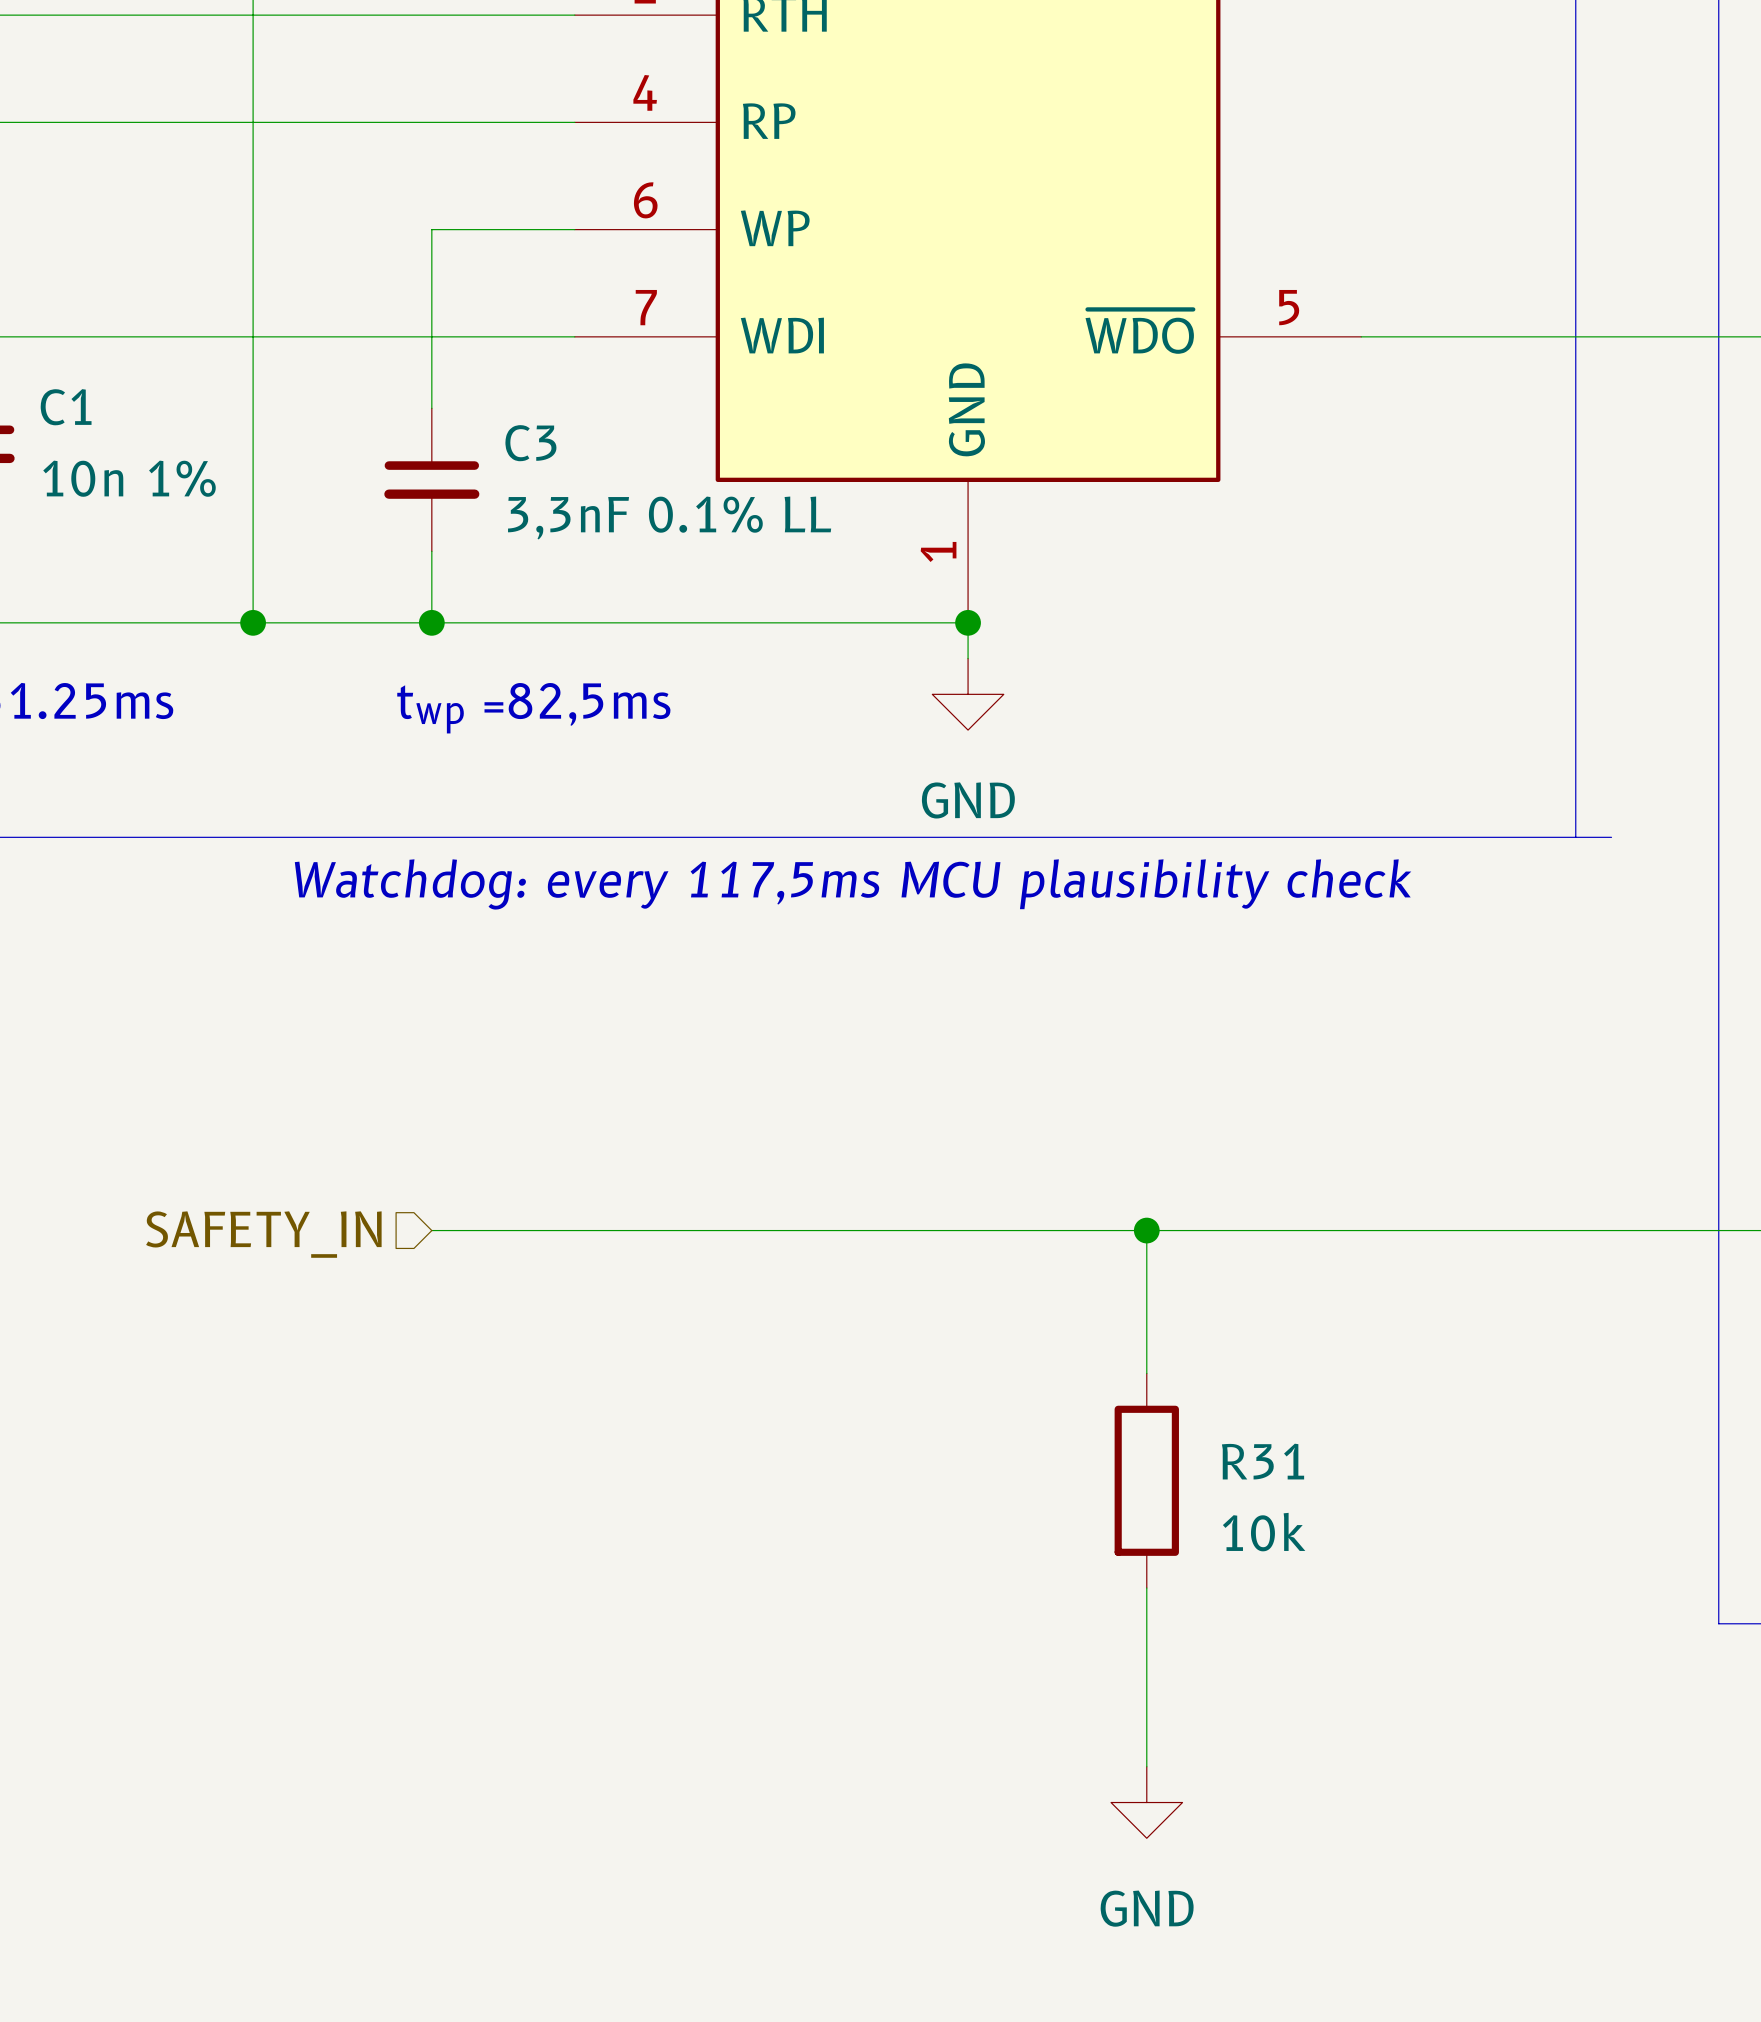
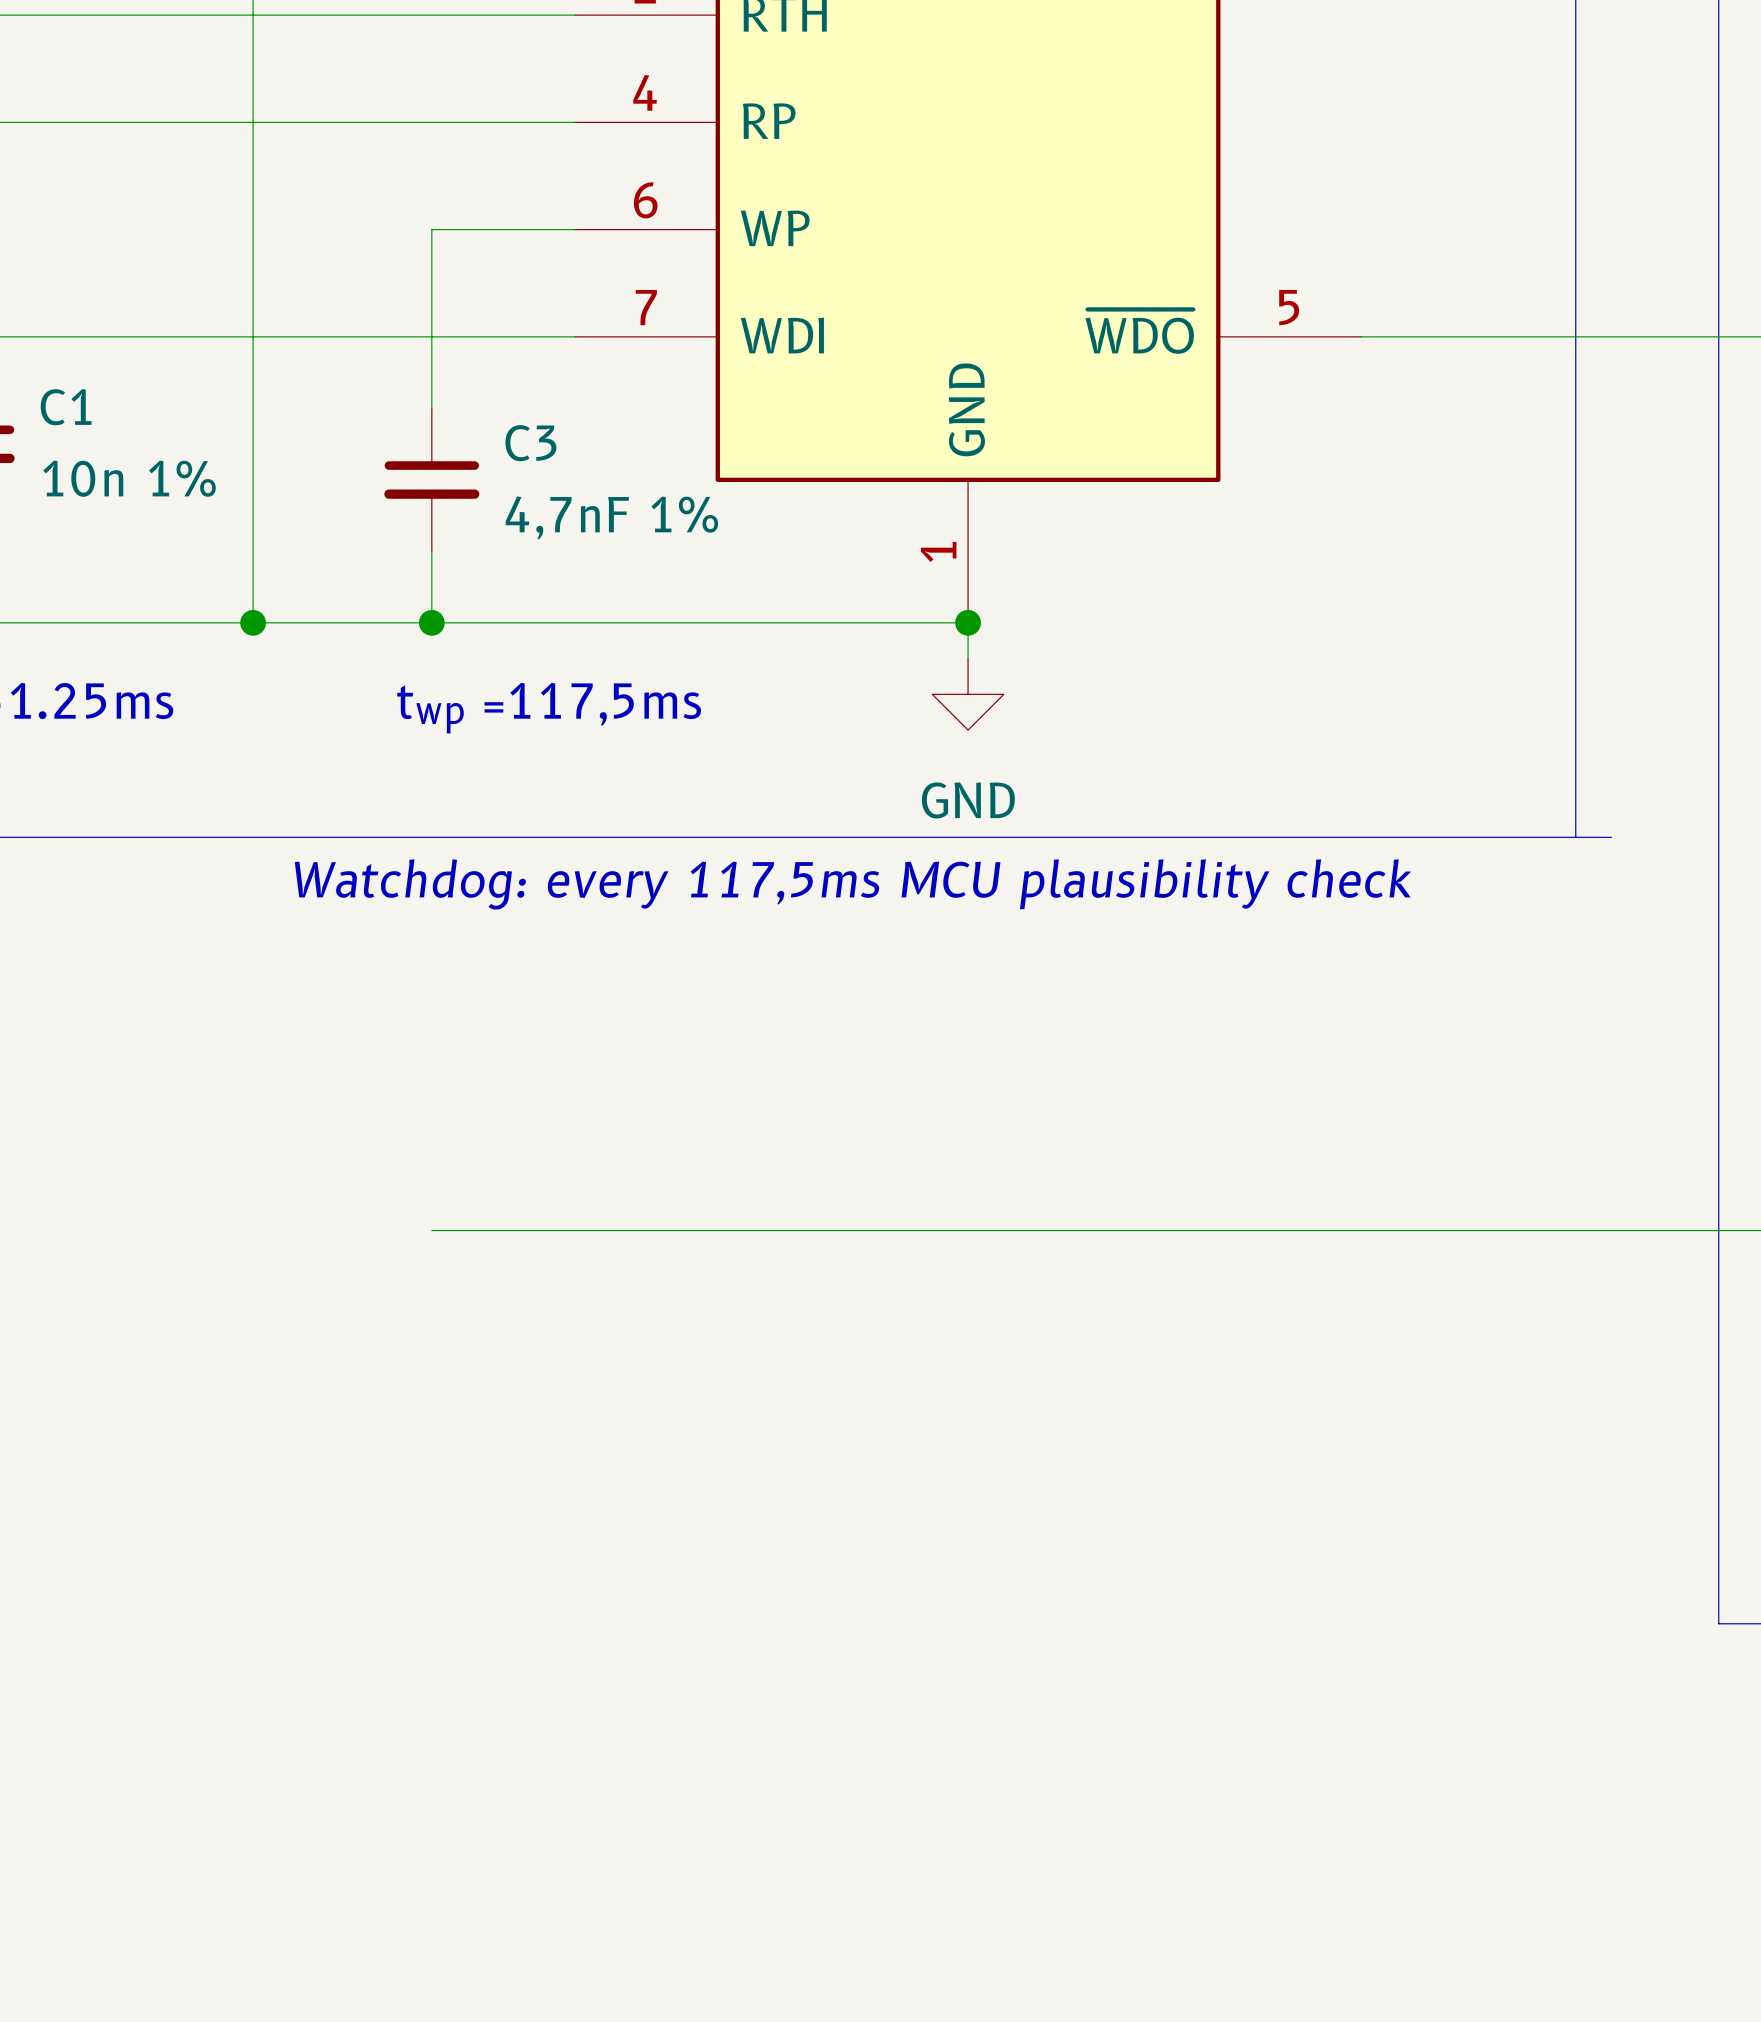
C3 value: 3,3nF 0.1% LL (669, 517) -> 4,7nF 1% (611, 517)
text: twp =82,5ms (533, 708) -> twp =117,5ms (549, 708)
wire: (1146, 1230) (1146, 1373) -> none
junction: (1146, 1230) -> none
hierarchical label: SAFETY_IN (263, 1234) -> none
R31: 10k (1146, 1480) -> none
wire: (1146, 1588) (1146, 1766) -> none
power symbol: GND (1146, 1802) -> none

